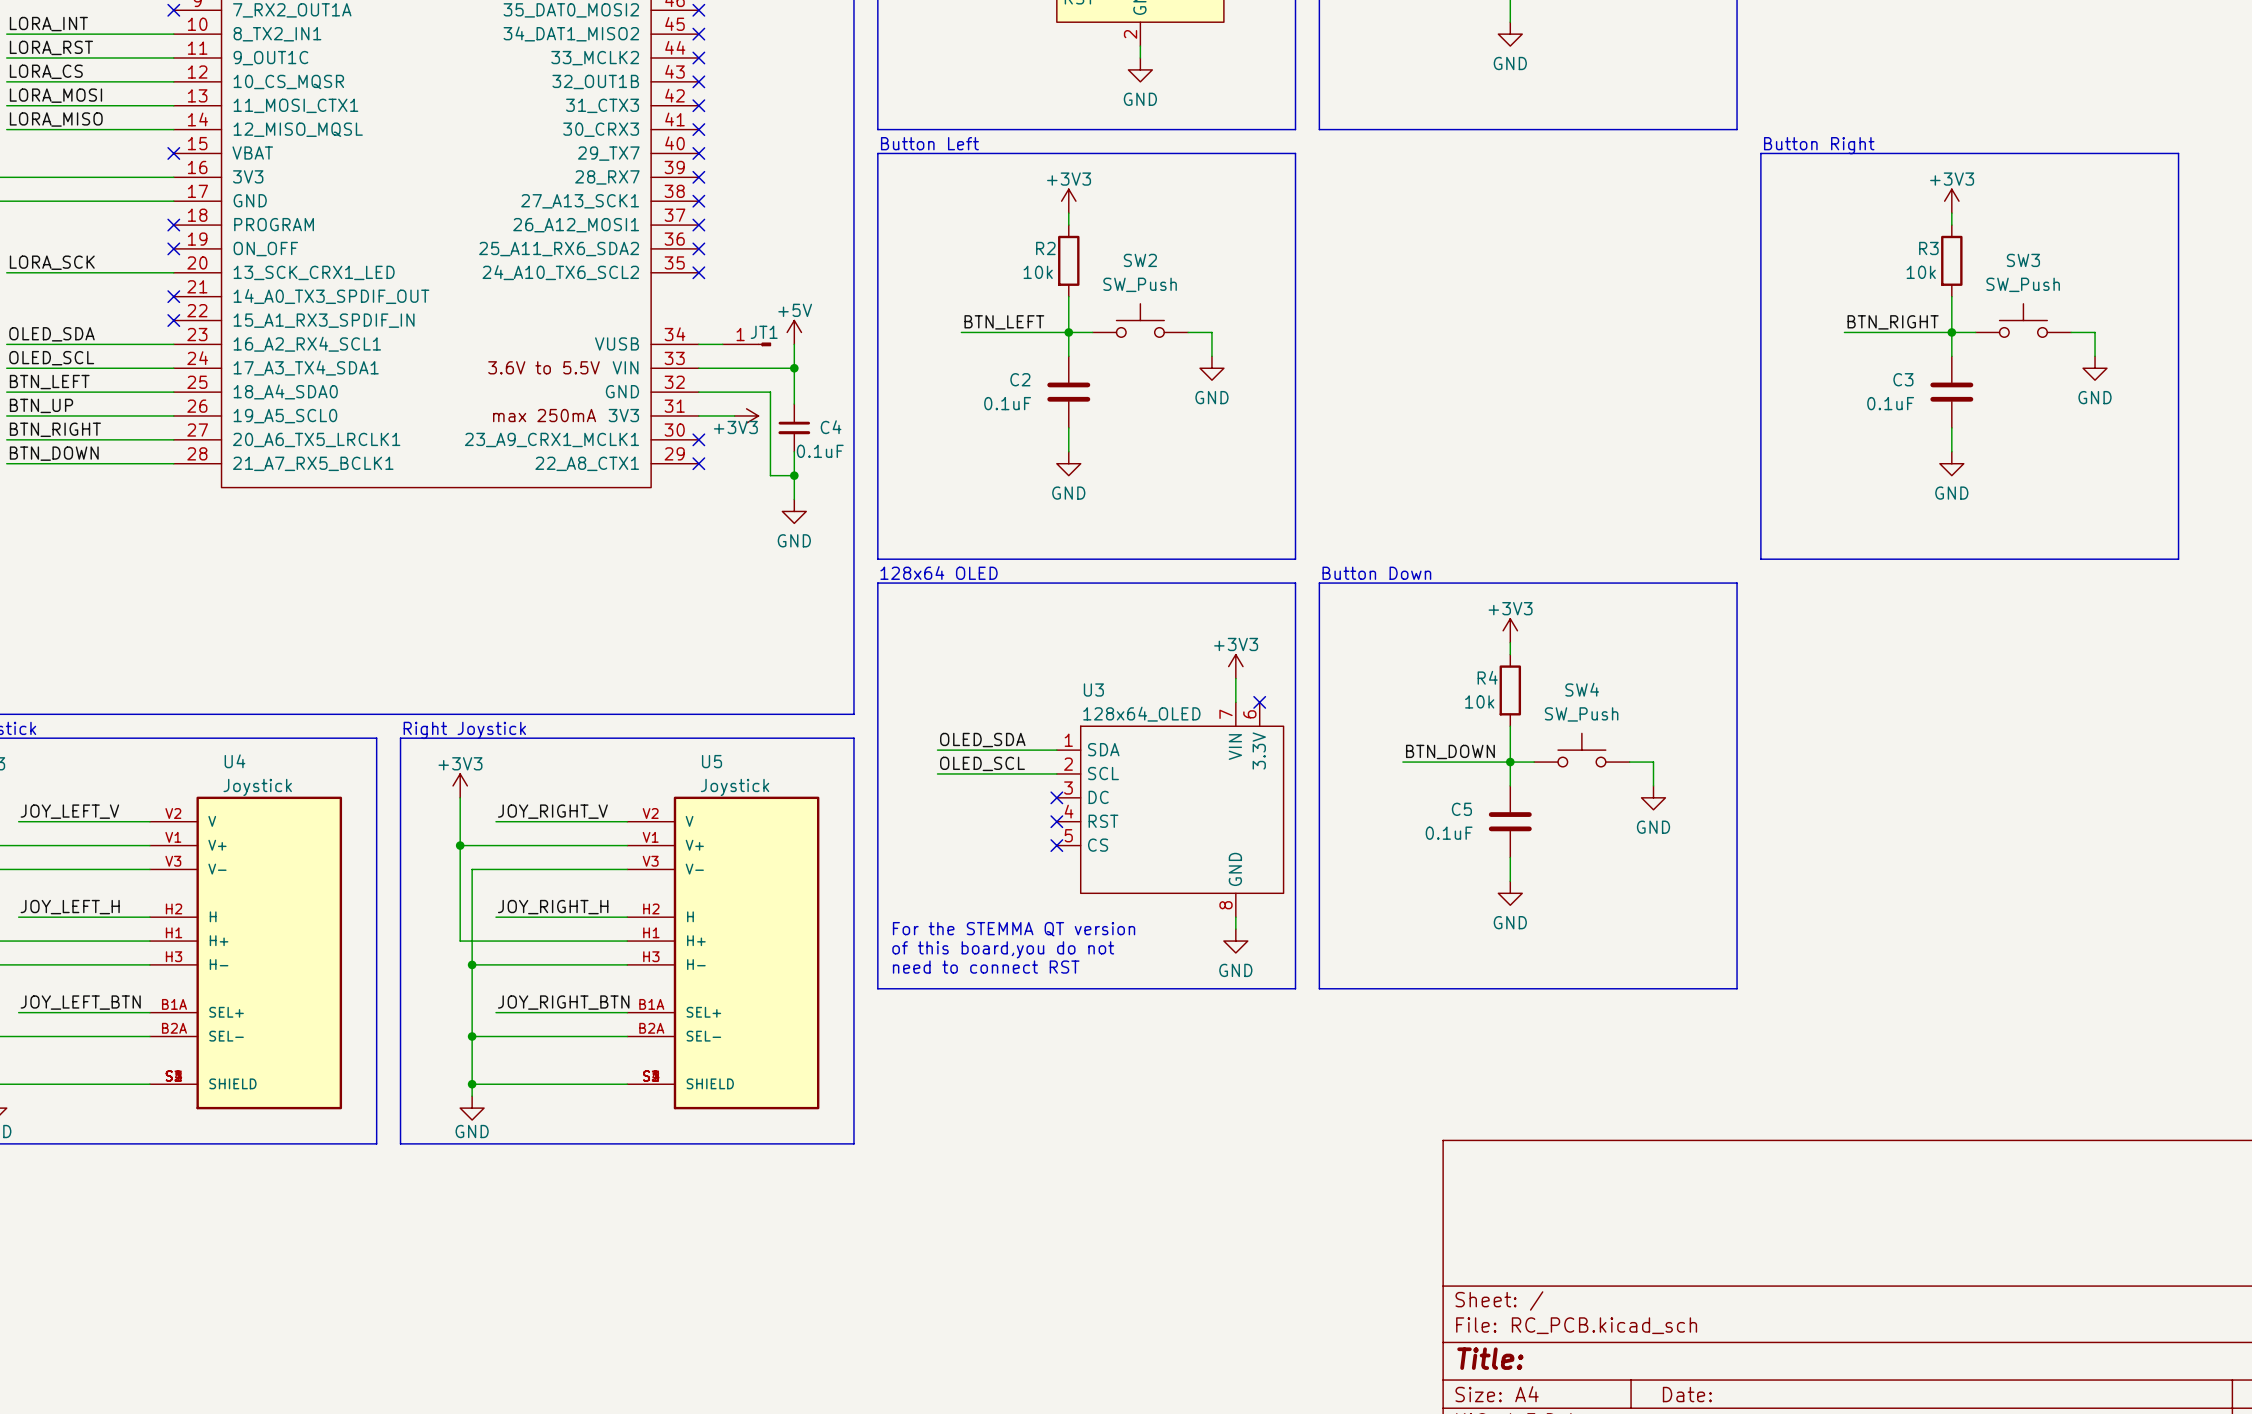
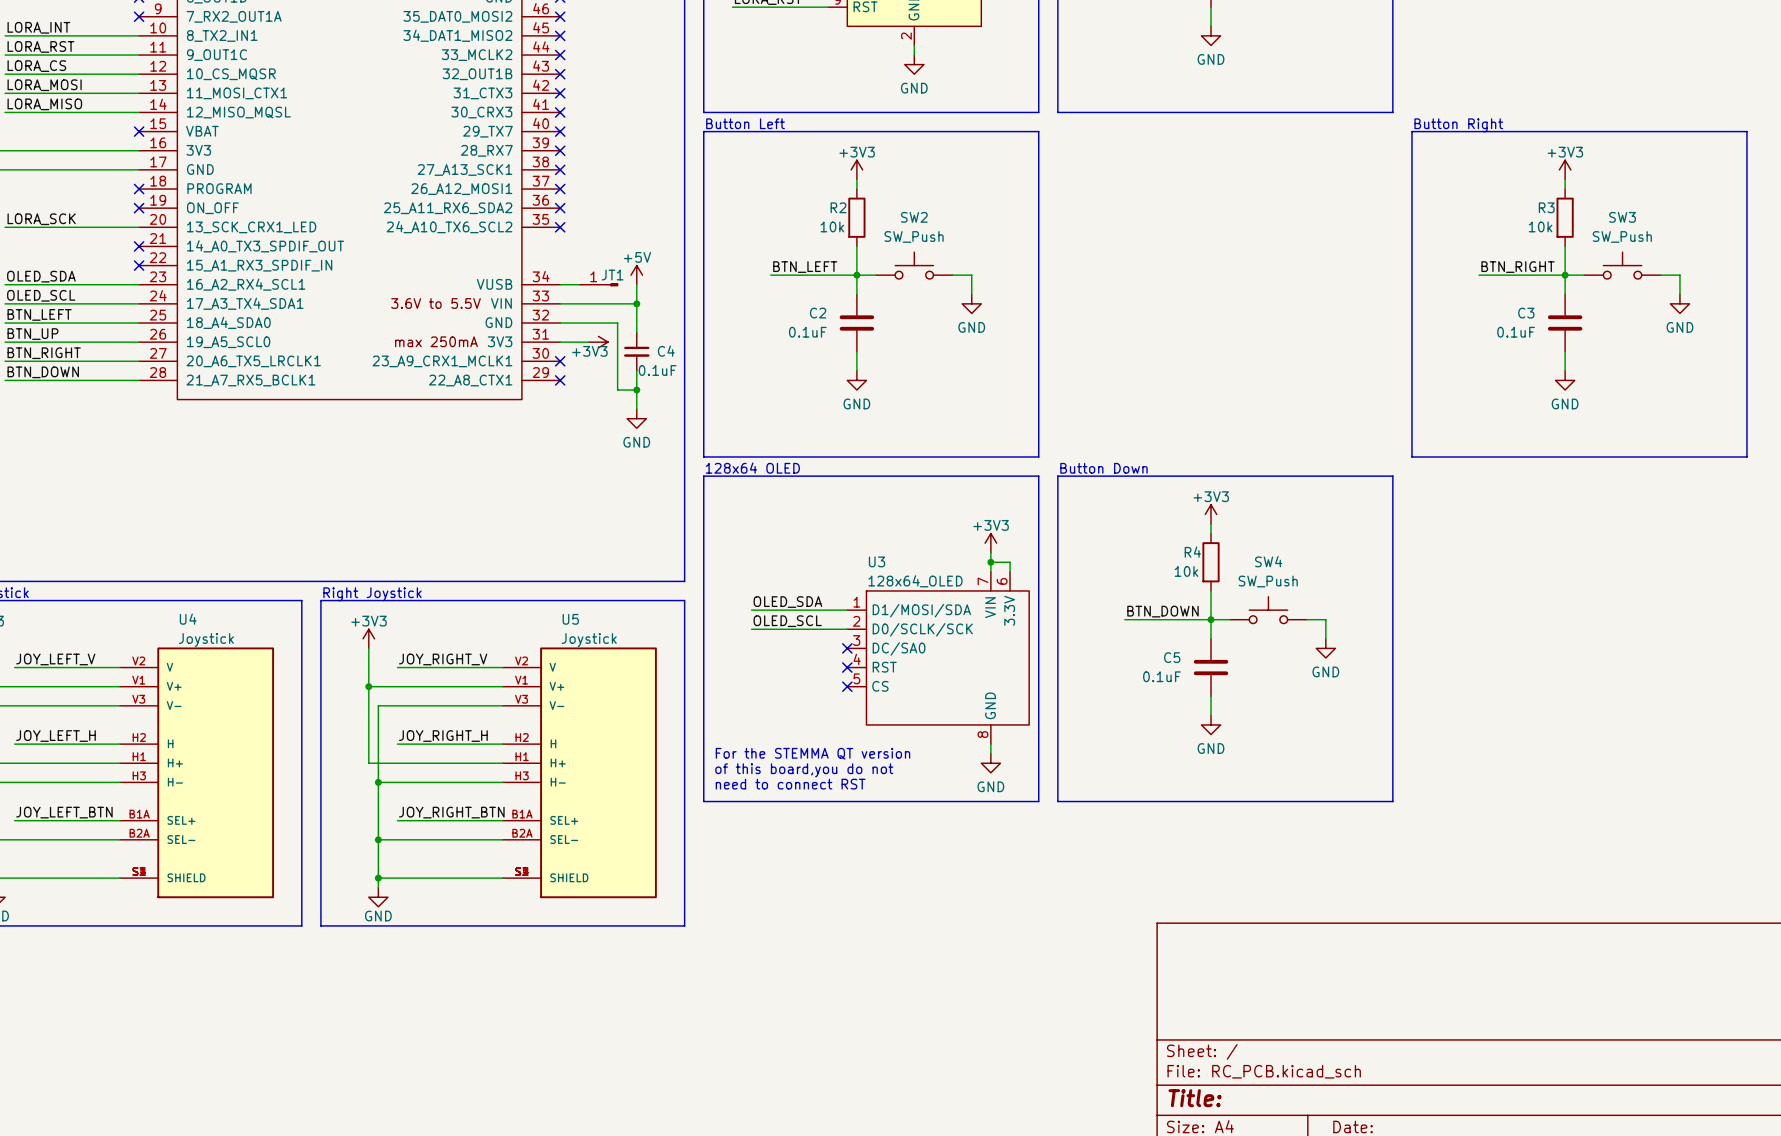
wire: none -> (990, 562) (1010, 562) (1010, 571)
junction: none -> (990, 562)
no-connect mark: (1259, 702) -> none
U3 pin name: SDA (1103, 749) -> D1/MOSI/SDA (921, 610)
U3 pin name: SCL (1103, 773) -> D0/SCLK/SCK (922, 629)
U3 pin name: DC (1098, 797) -> DC/SA0 (899, 648)

